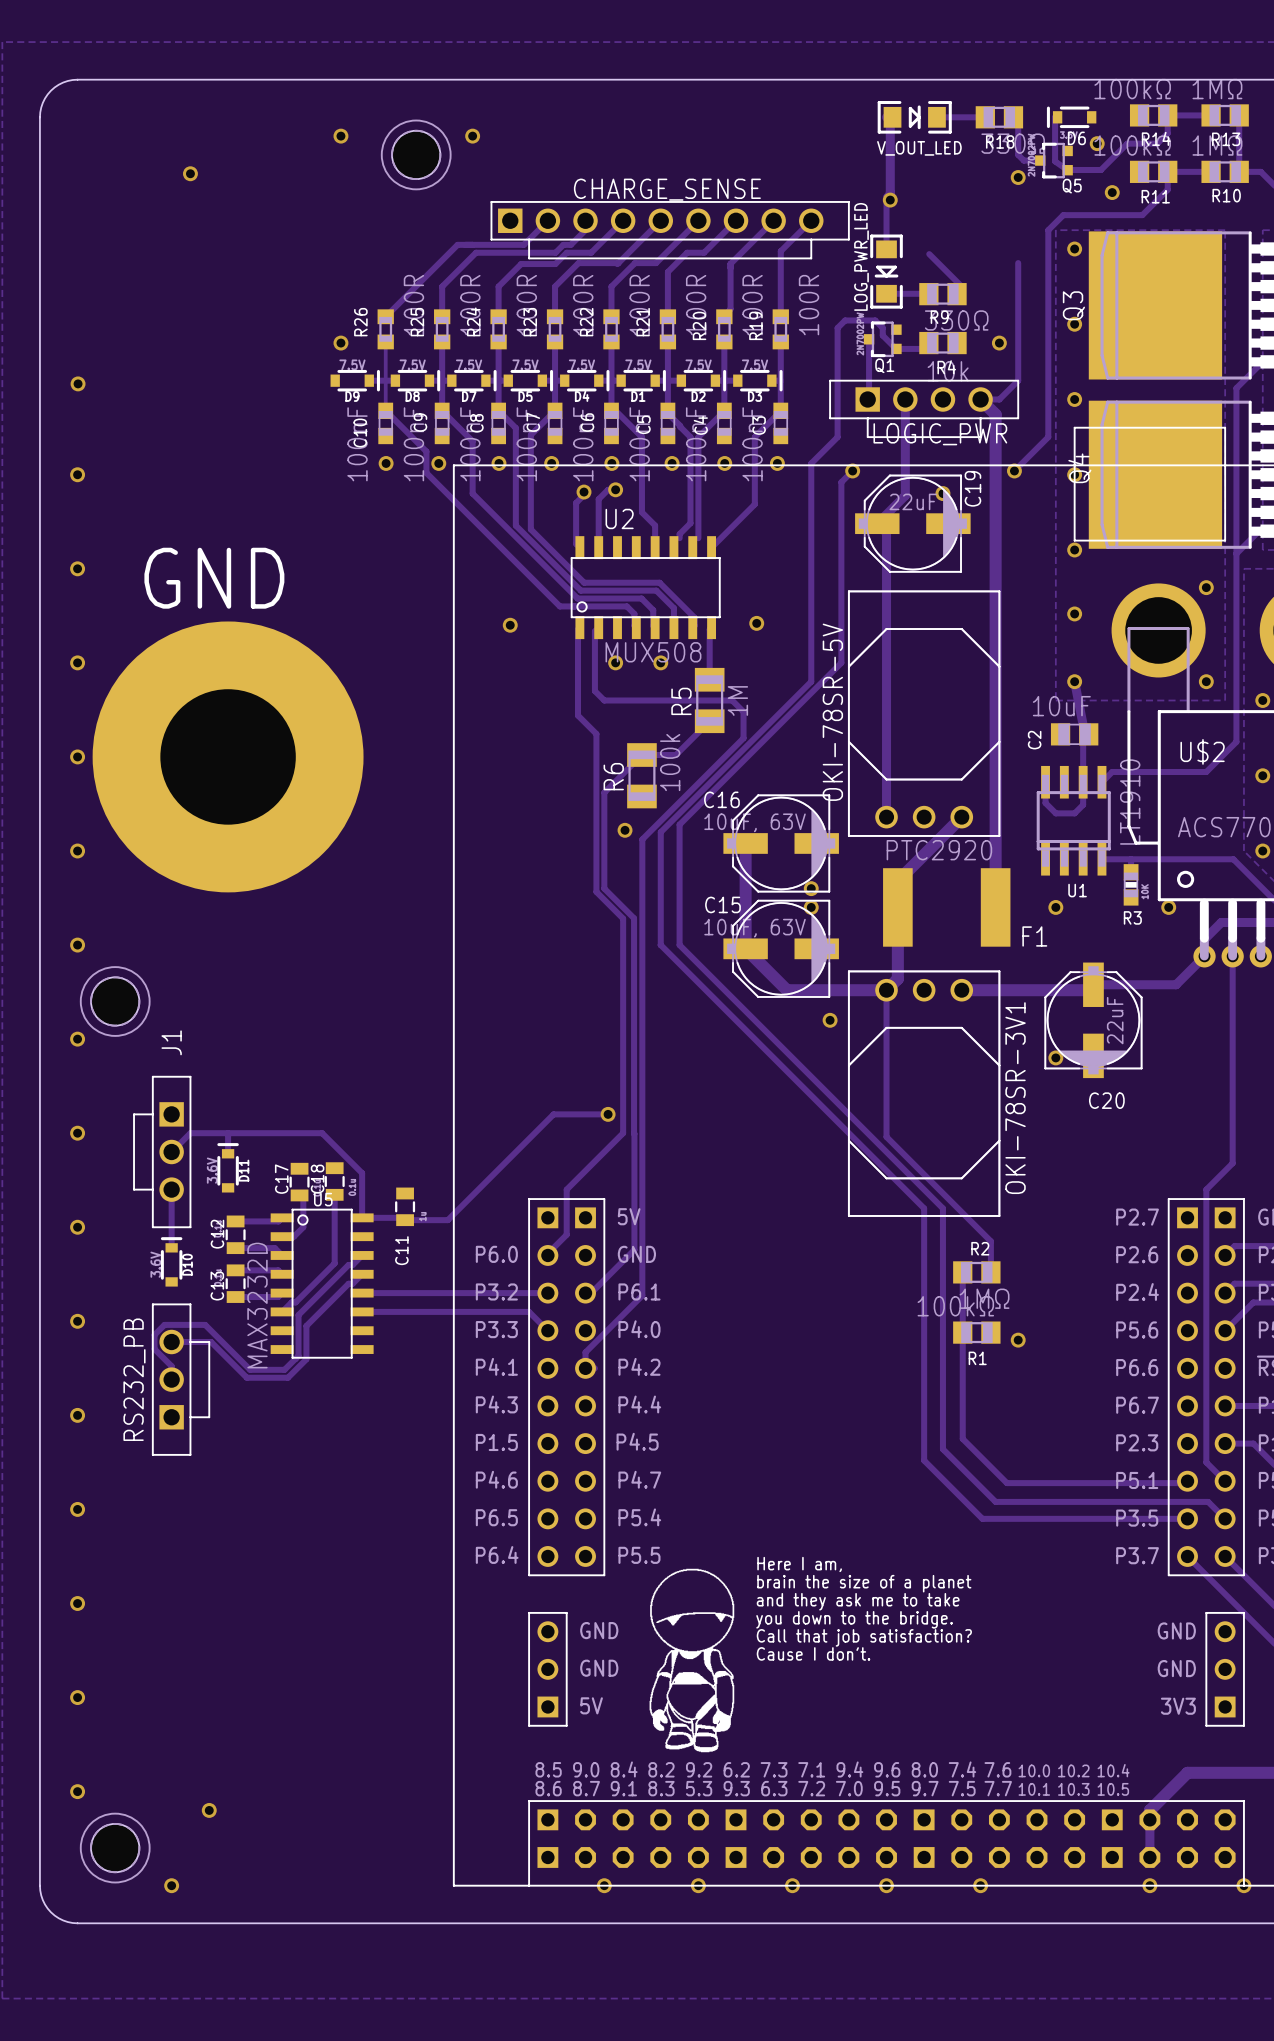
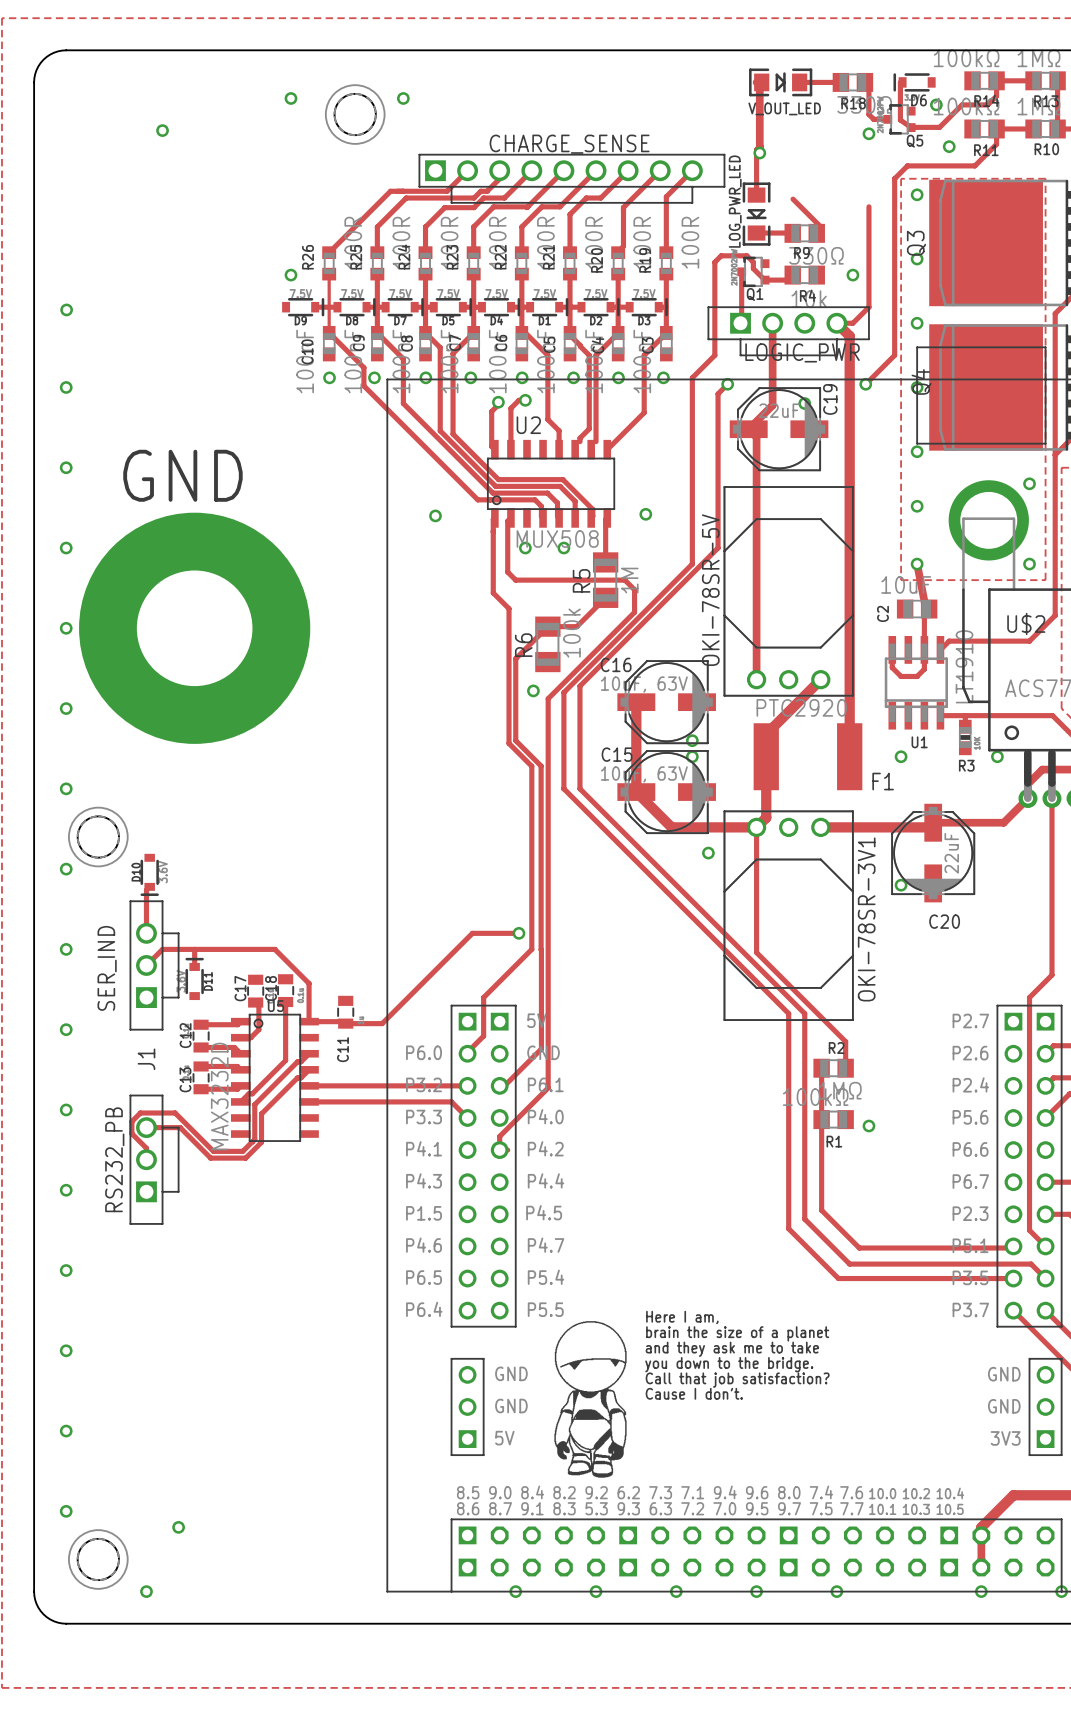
track: none -> (149, 886) (146, 890) (146, 933)
J1 rotation: 0° (162, 1152) -> 180° (154, 965)
text: none -> SER_IND (107, 968)
track: (171, 1189) (171, 1247) -> none
D10 rotation: 0° (171, 1261) -> 180° (149, 874)
D10 position: (171, 1261) -> (149, 874)

